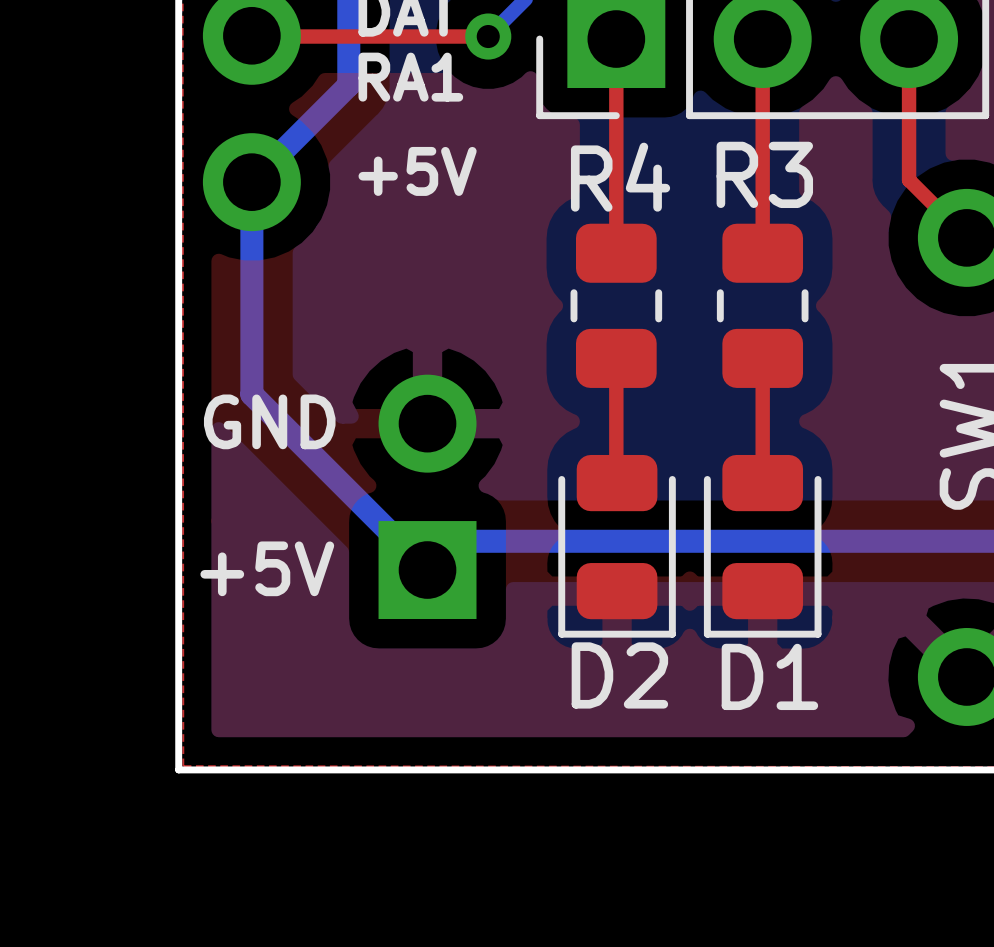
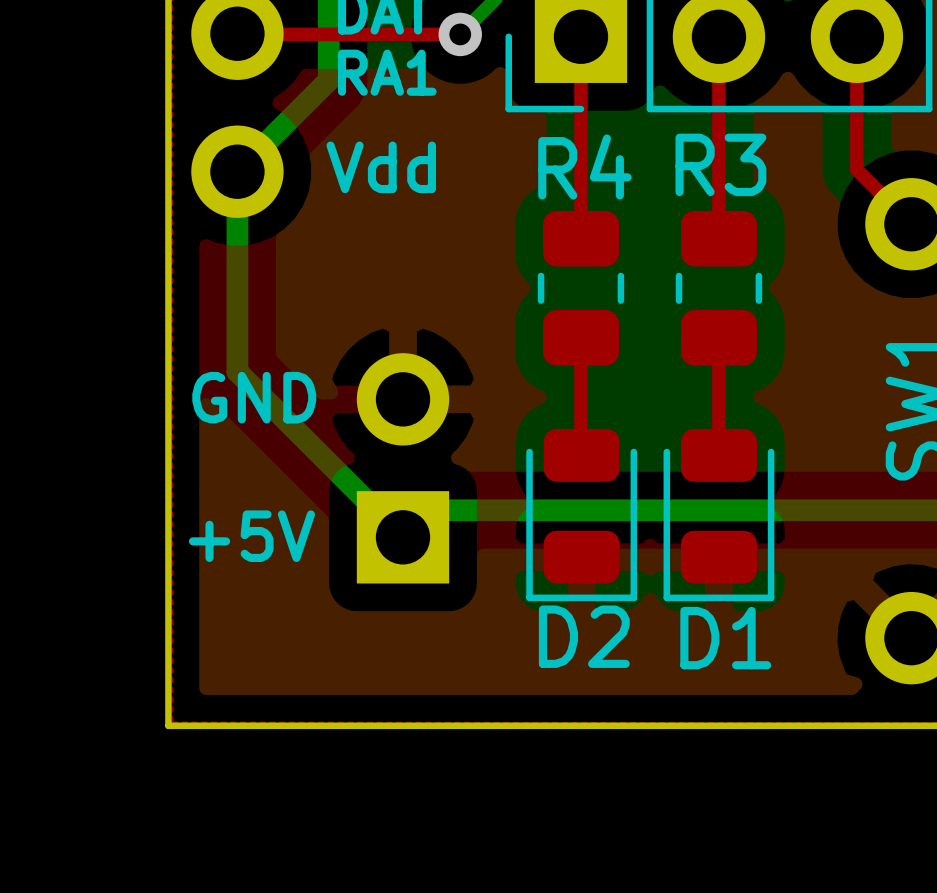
text: +5V (417, 171) -> none
text: none -> Vdd (381, 167)

